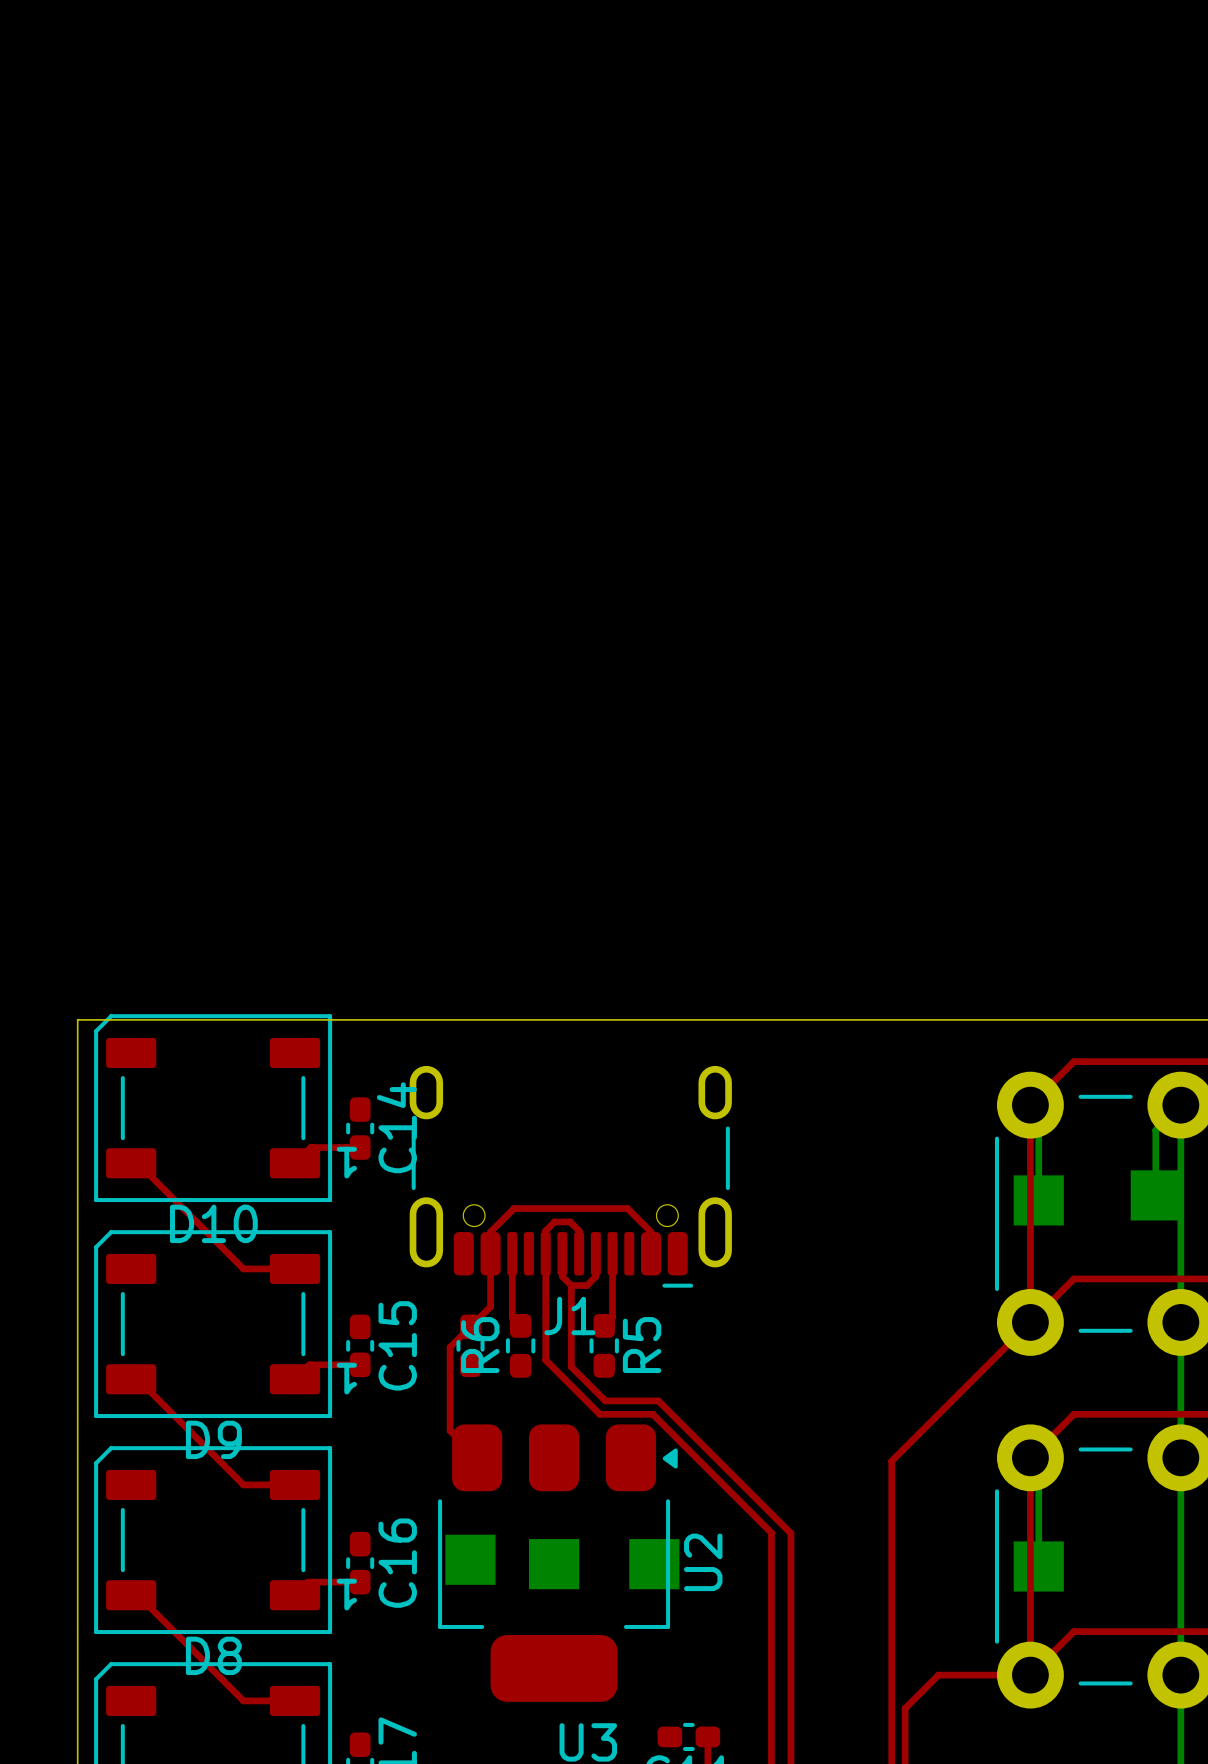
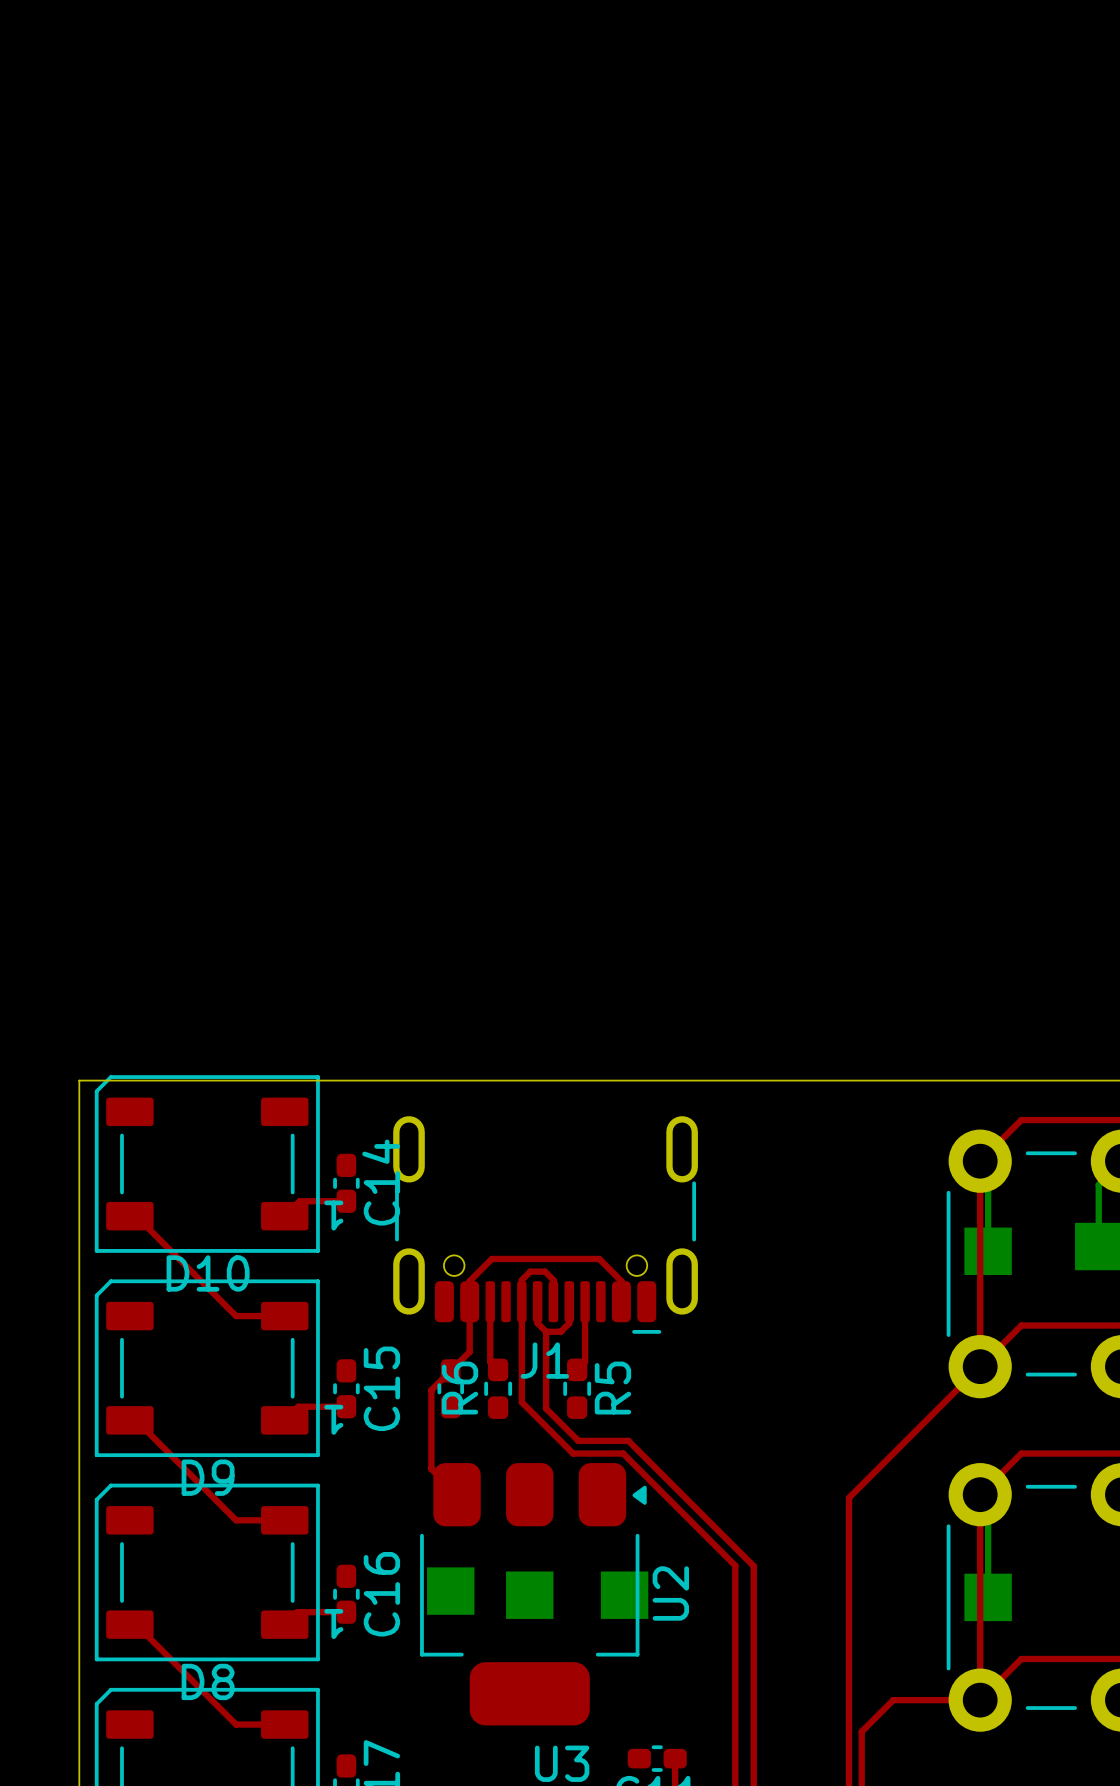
J1 footprint: [409, 1065, 732, 1288] -> [393, 1116, 698, 1334]

